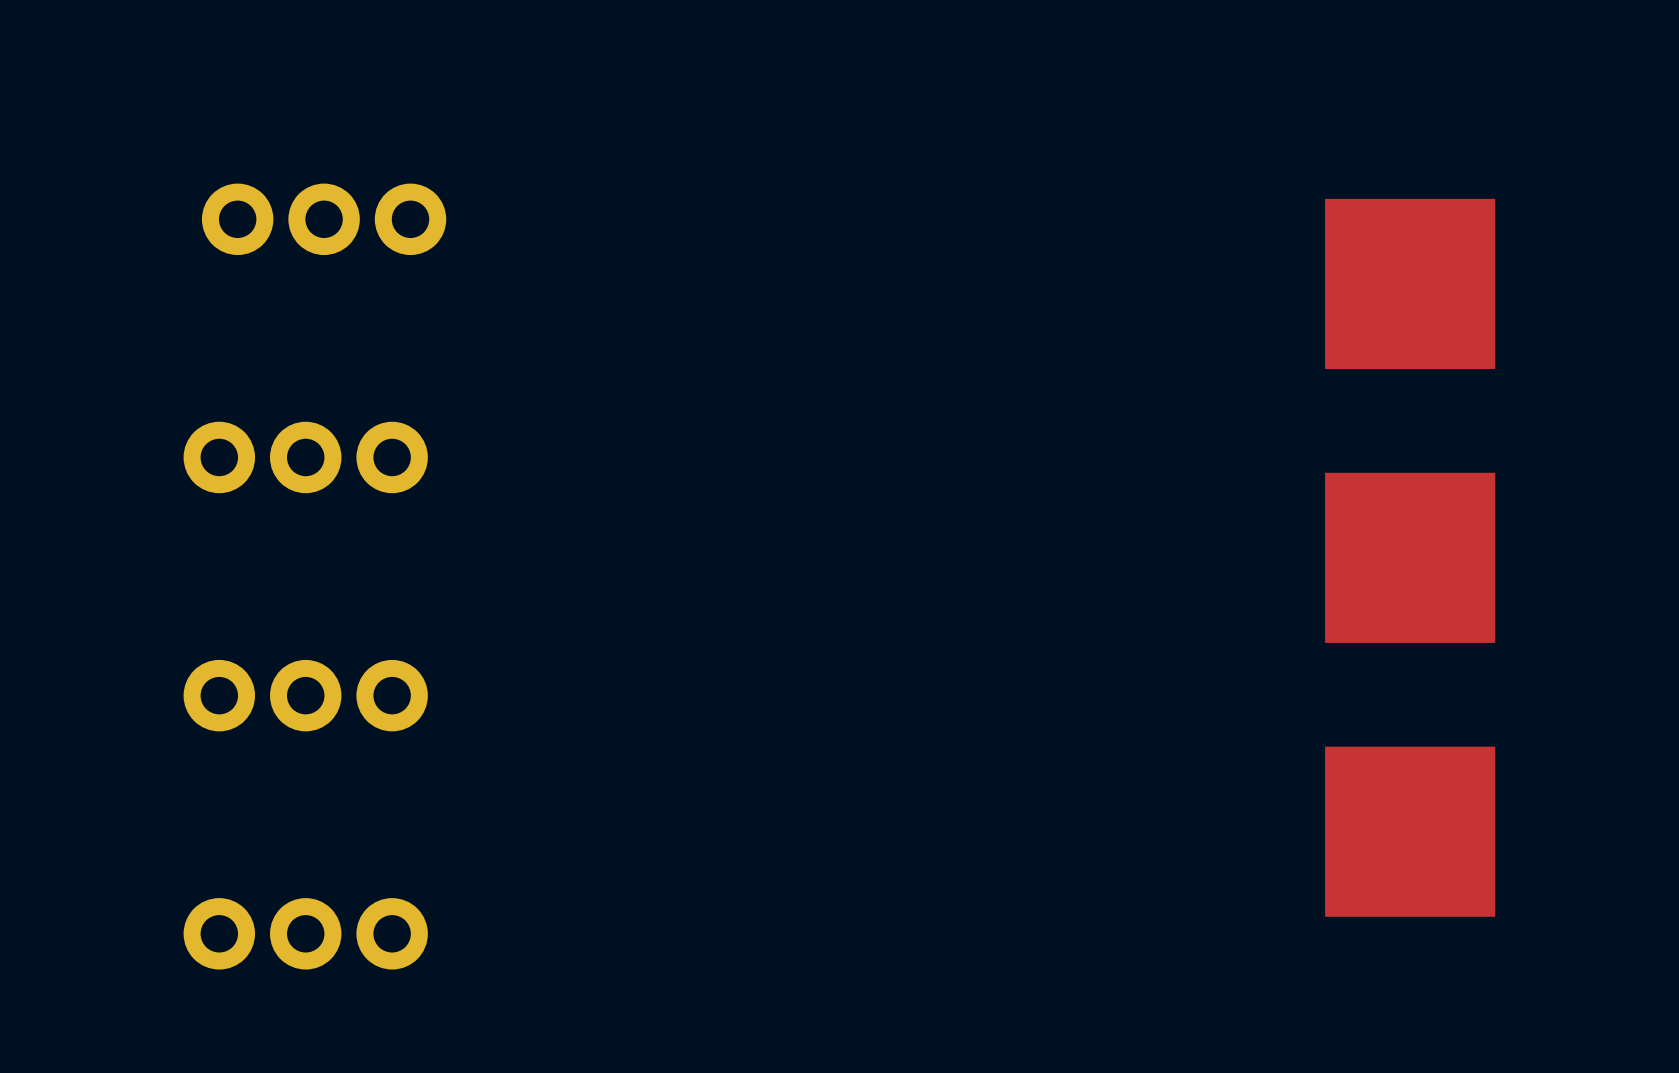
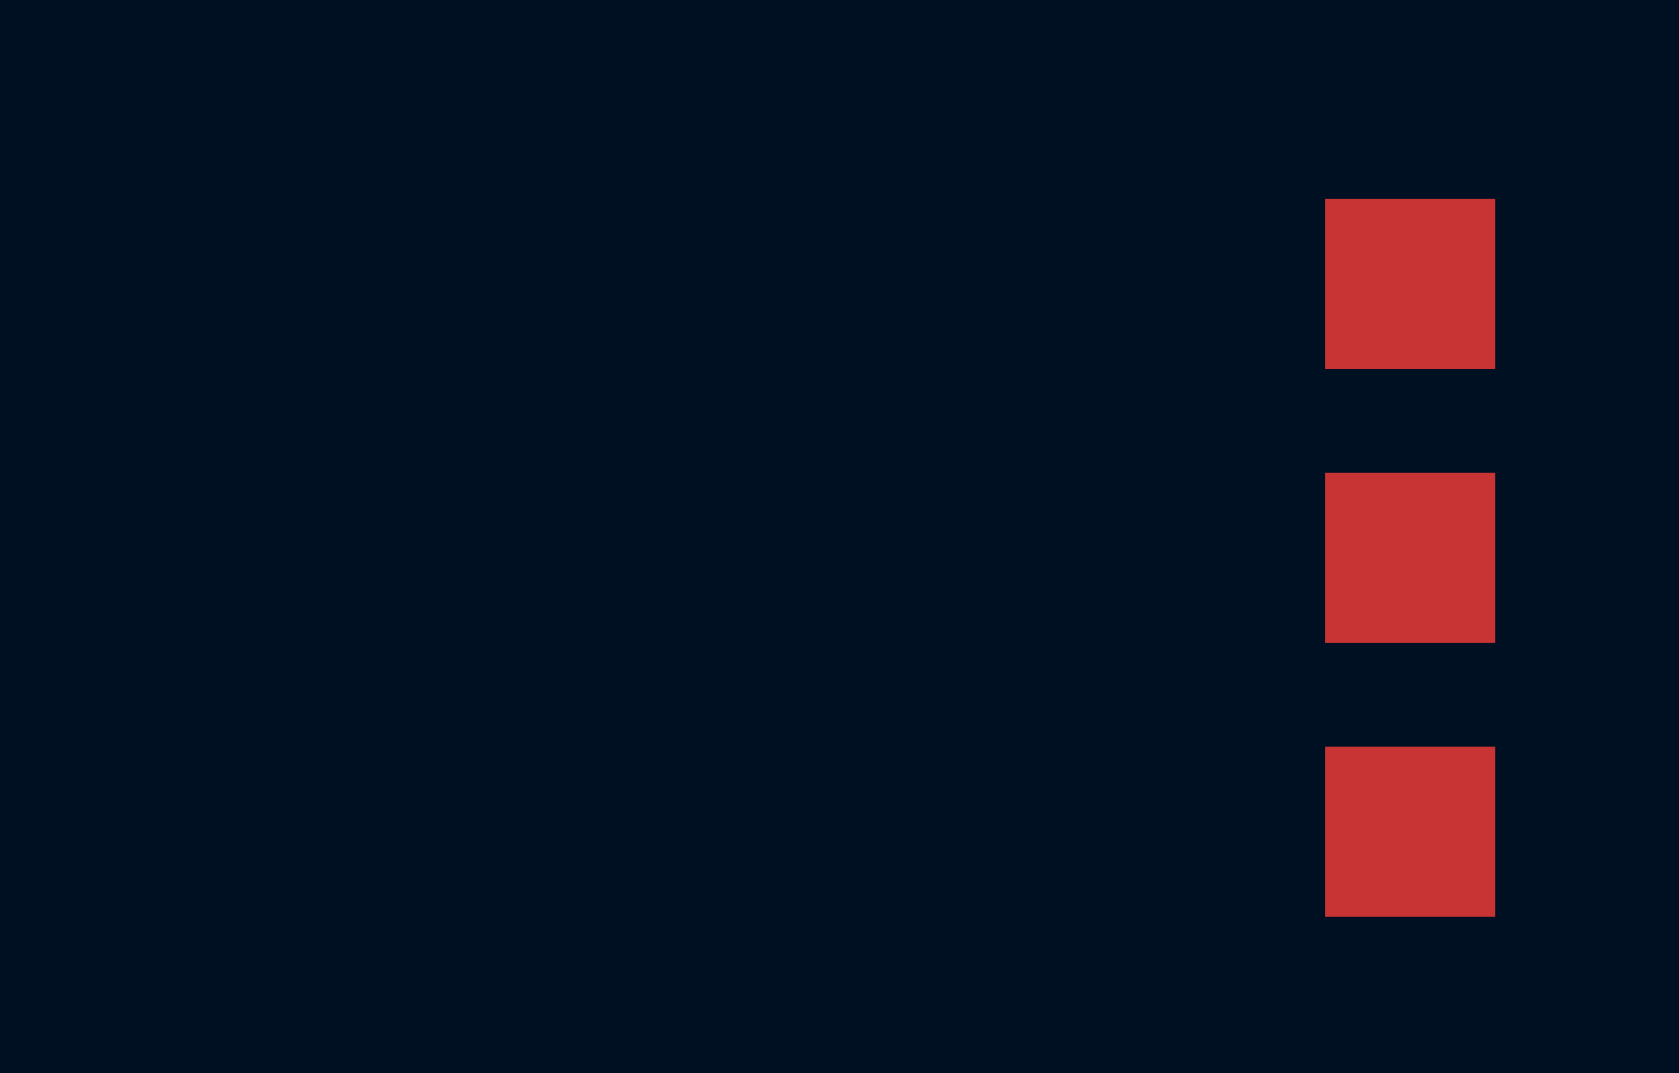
part: (324, 219) -> none
part: (305, 457) -> none
part: (305, 695) -> none
part: (305, 933) -> none

